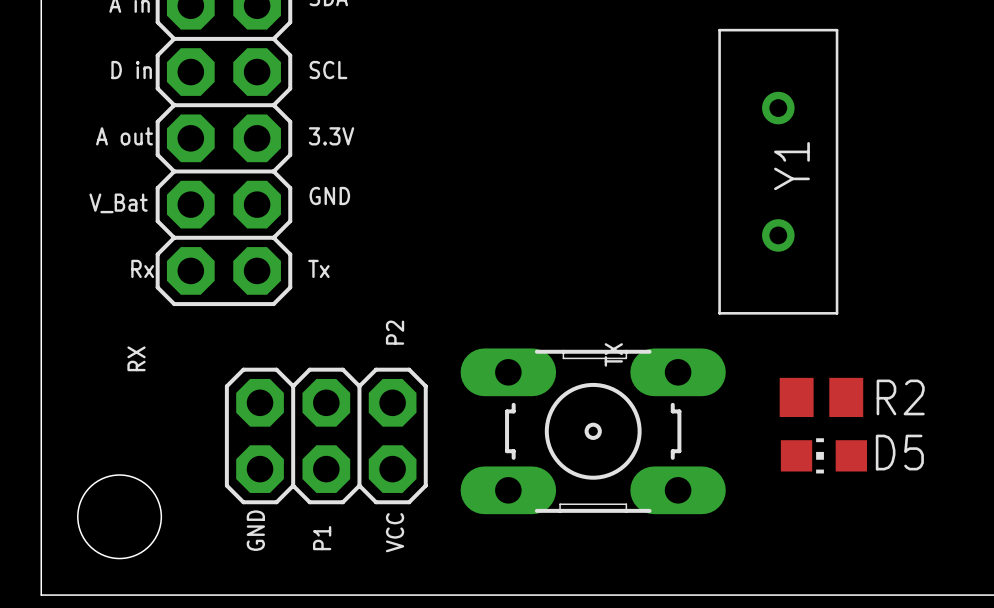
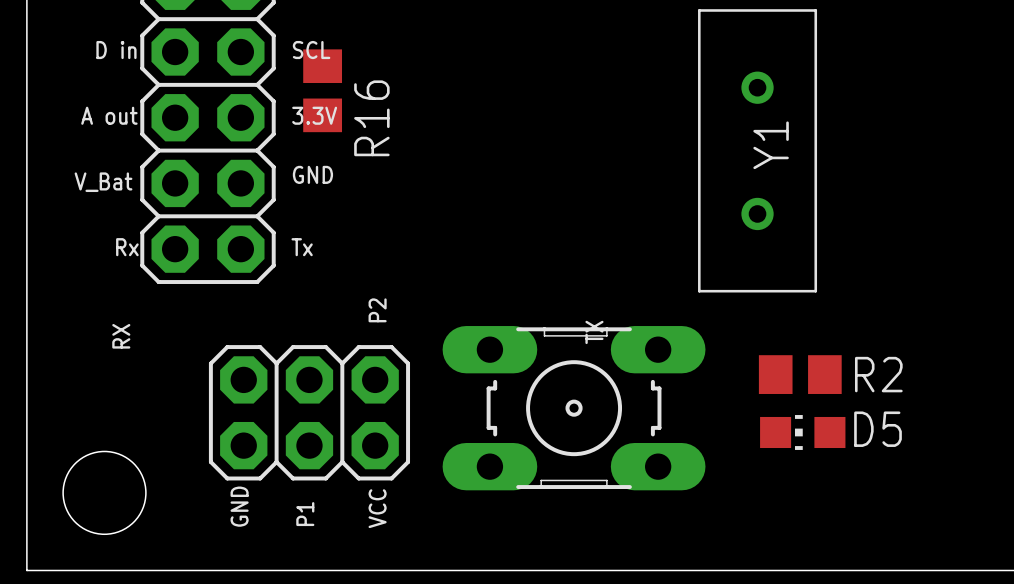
R16: none -> (322, 90)

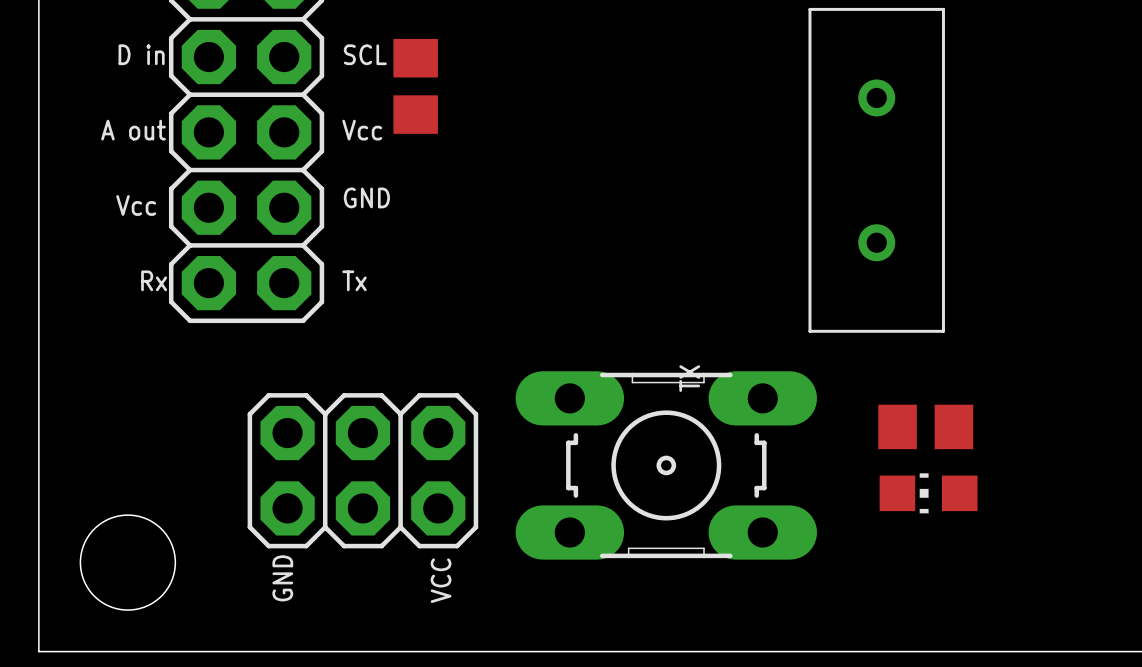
part: none -> (415, 86)
R16: (322, 90) -> none
text: 3.3V (314, 115) -> Vcc (362, 130)
Y1 name: Y1 (771, 145) -> none
text: V_Bat (103, 182) -> Vcc (136, 205)
text: P2 (377, 310) -> none
text: RX (121, 336) -> none
R2 name: R2 (878, 374) -> none
D5 name: D5 (878, 429) -> none
text: P1 (305, 514) -> none

